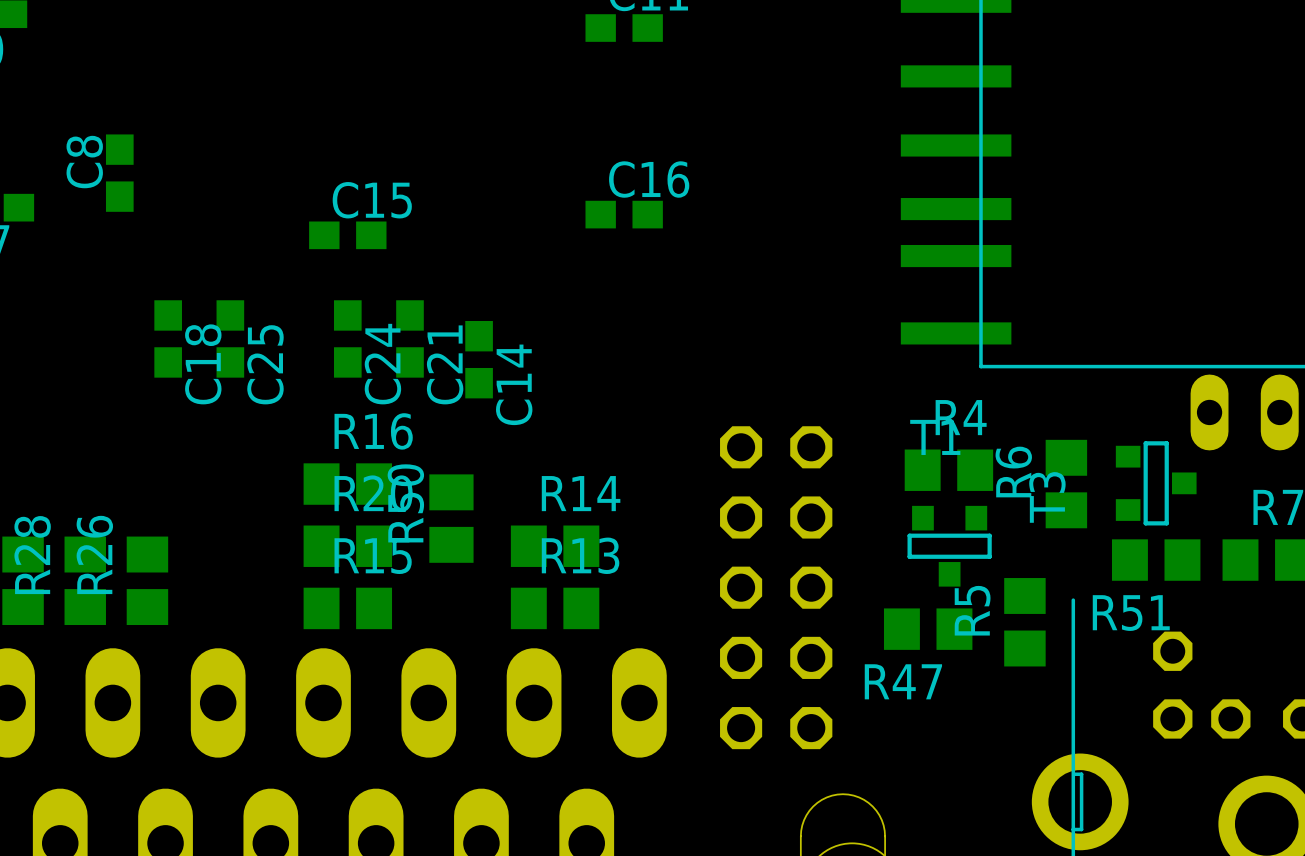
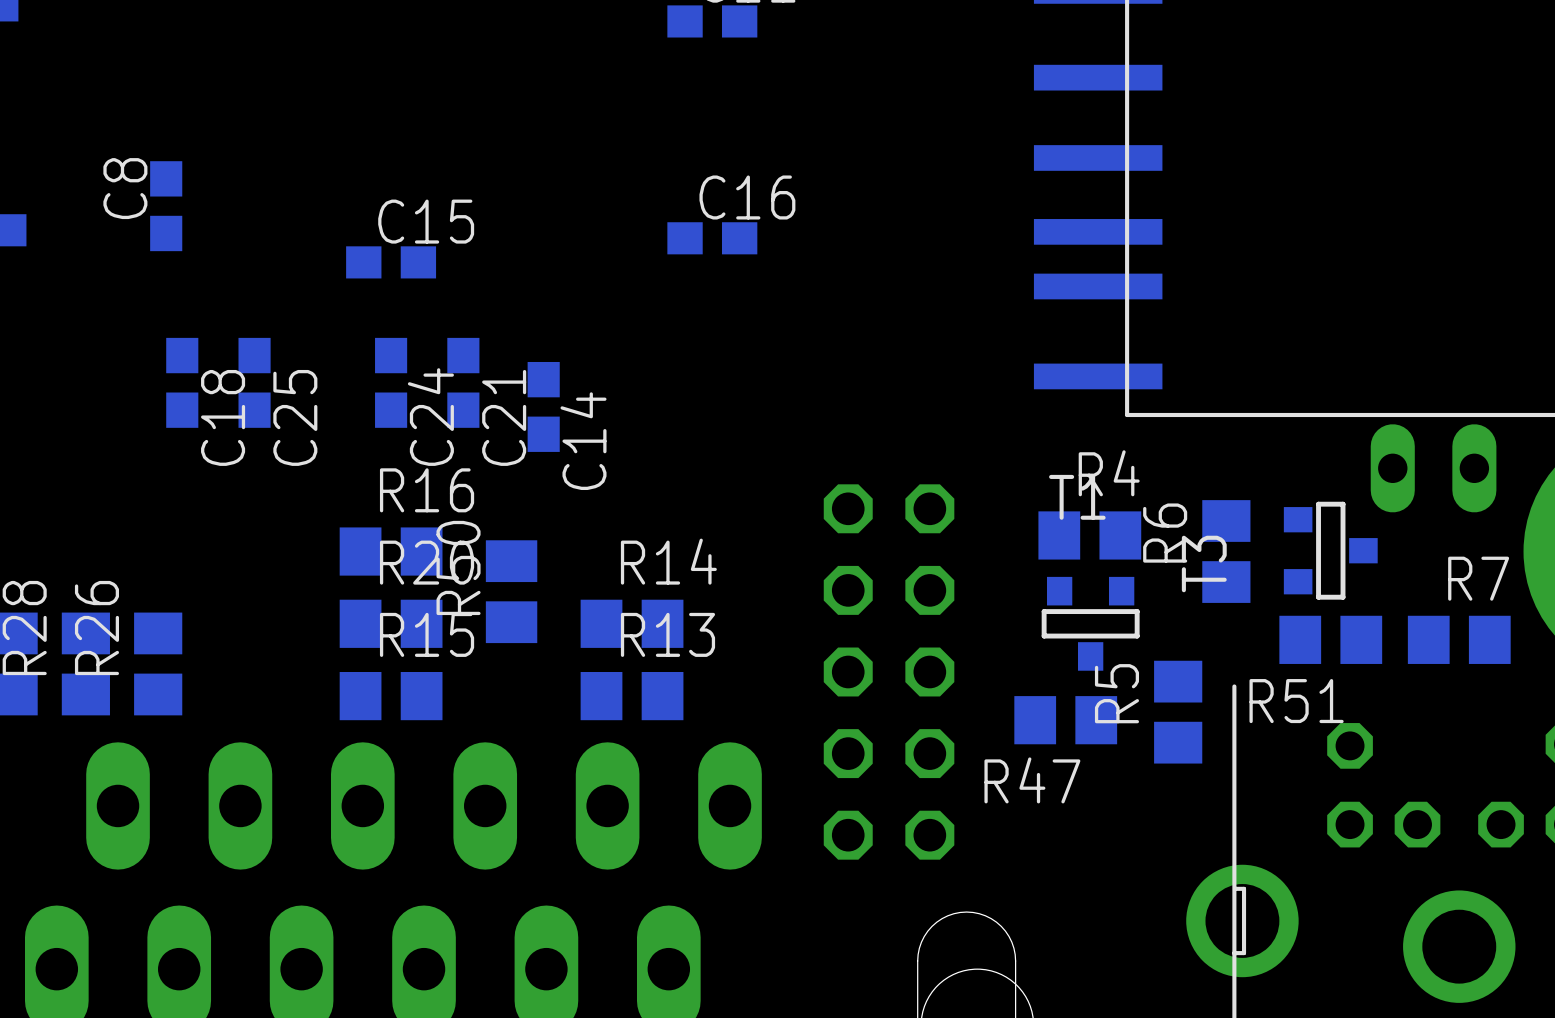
C8 position: (119, 173) -> (166, 206)

